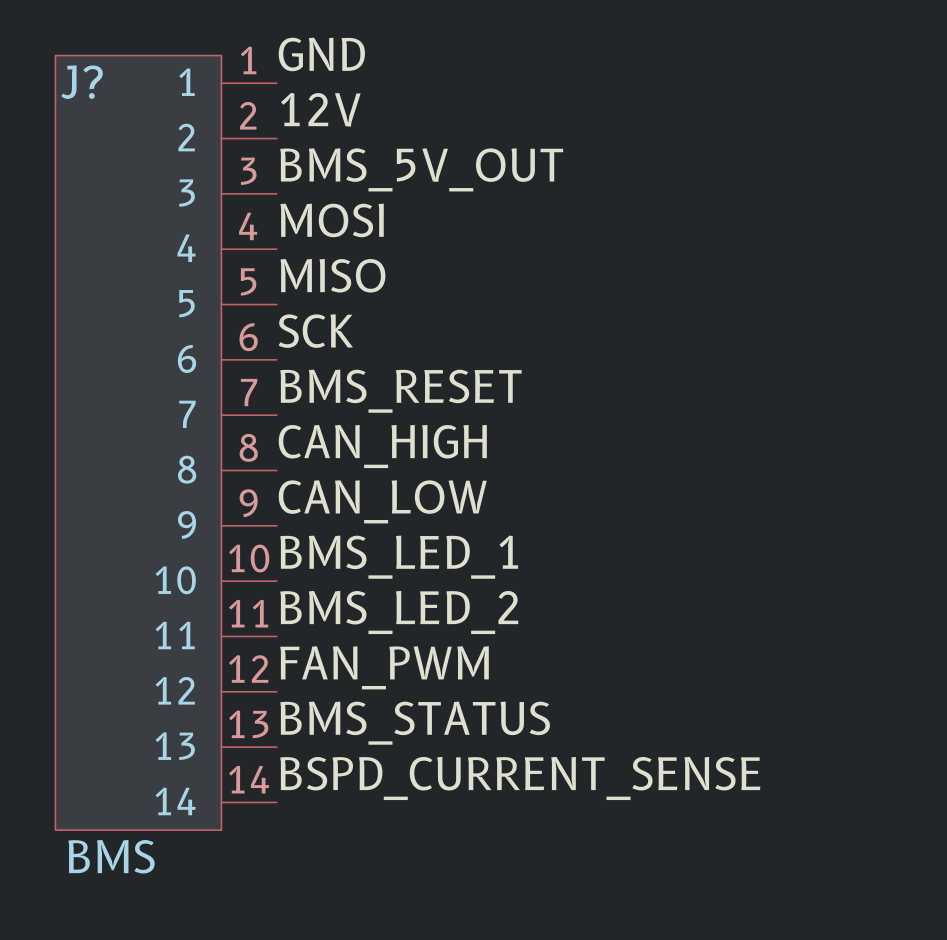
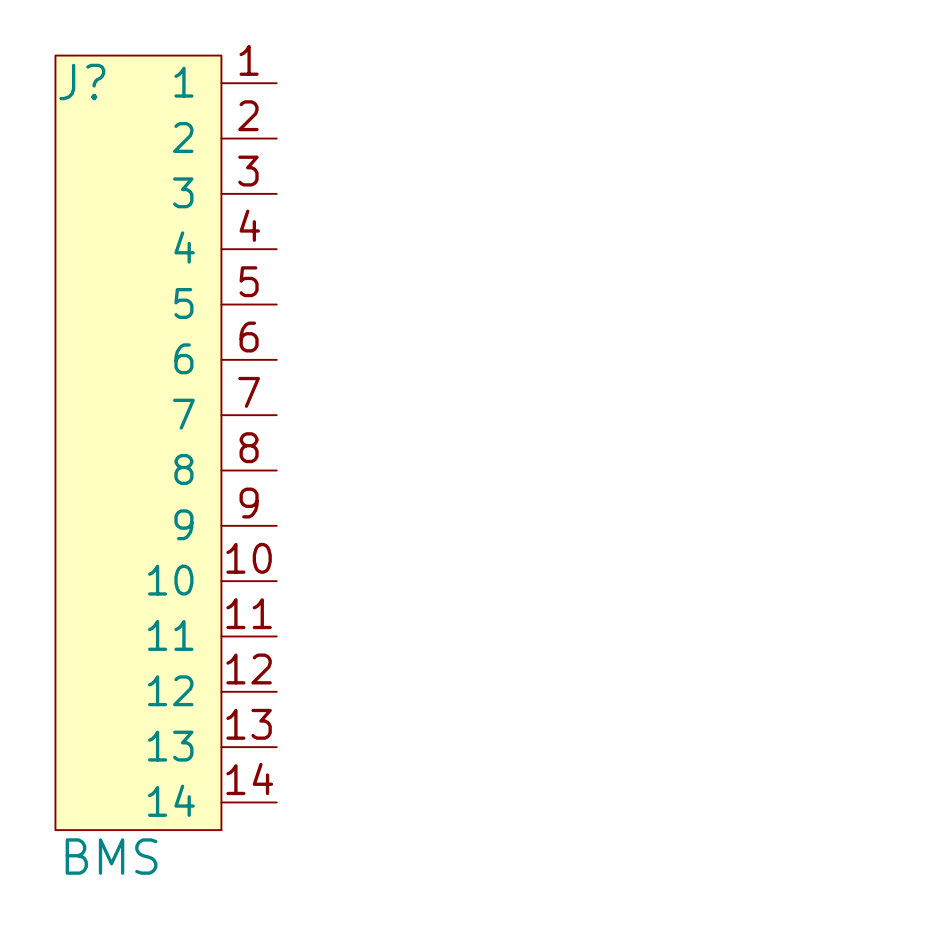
label: GND (321, 54) -> none
label: 12V (320, 109) -> none
label: BMS_5V_OUT (421, 169) -> none
label: MOSI (332, 220) -> none
label: MISO (332, 275) -> none
label: SCK (315, 331) -> none
label: BMS_RESET (400, 391) -> none
label: CAN_HIGH (382, 446) -> none
label: CAN_LOW (382, 501) -> none
label: BMS_LED_1 (399, 557) -> none
label: BMS_LED_2 (399, 612) -> none
label: FAN_PWM (384, 667) -> none
label: BMS_STATUS (415, 723) -> none
label: BSPD_CURRENT_SENSE (520, 778) -> none

